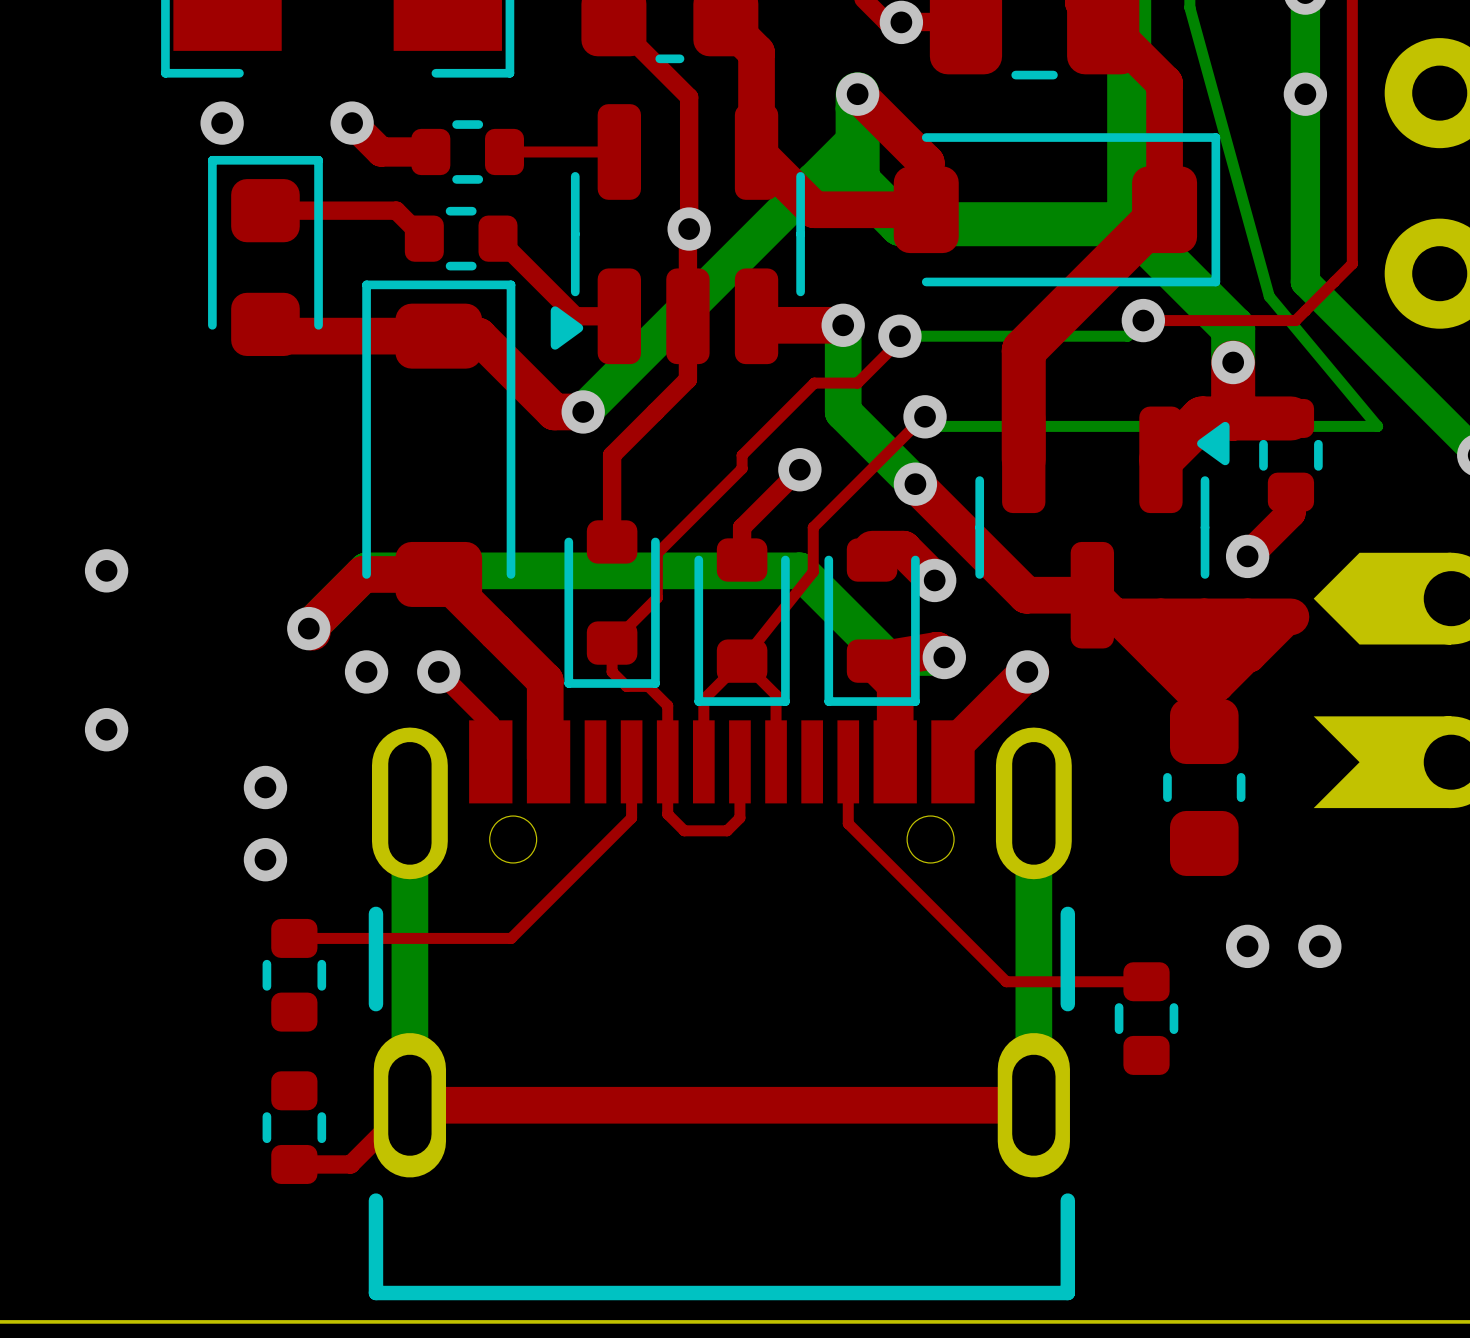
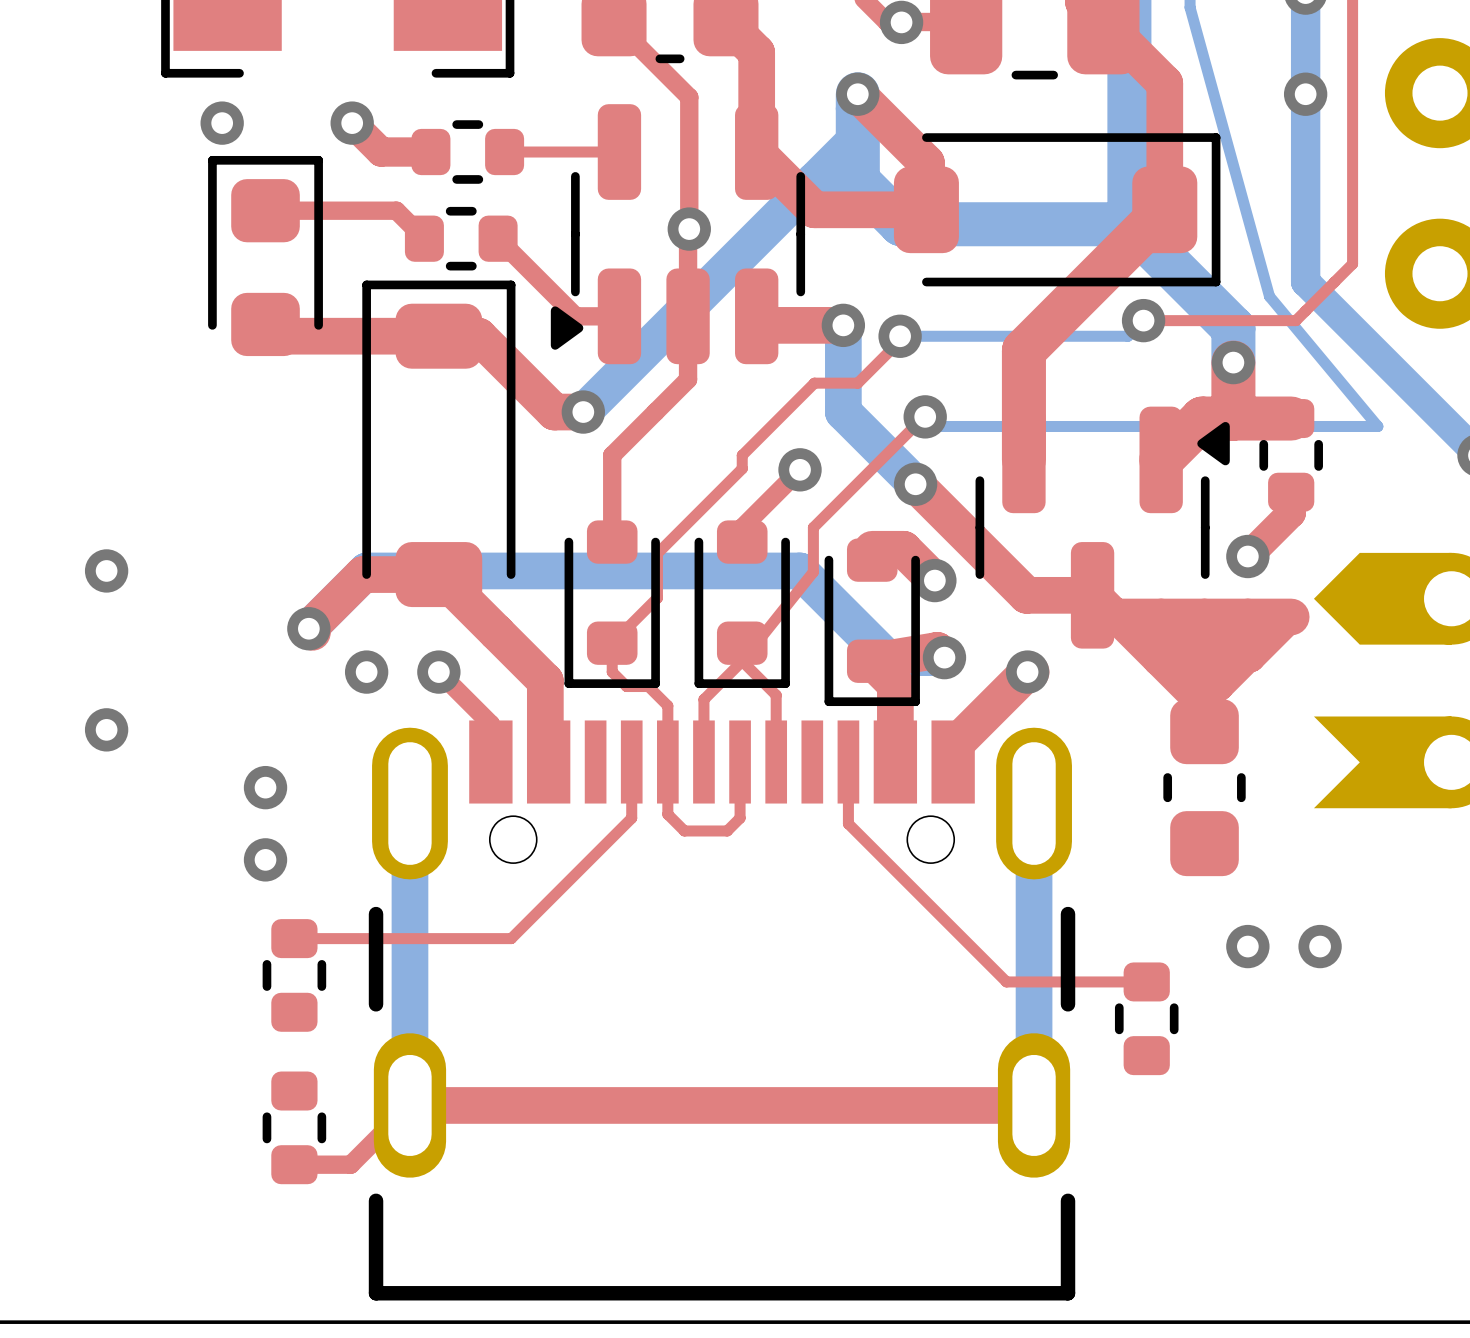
part position: (742, 622) -> (742, 604)

